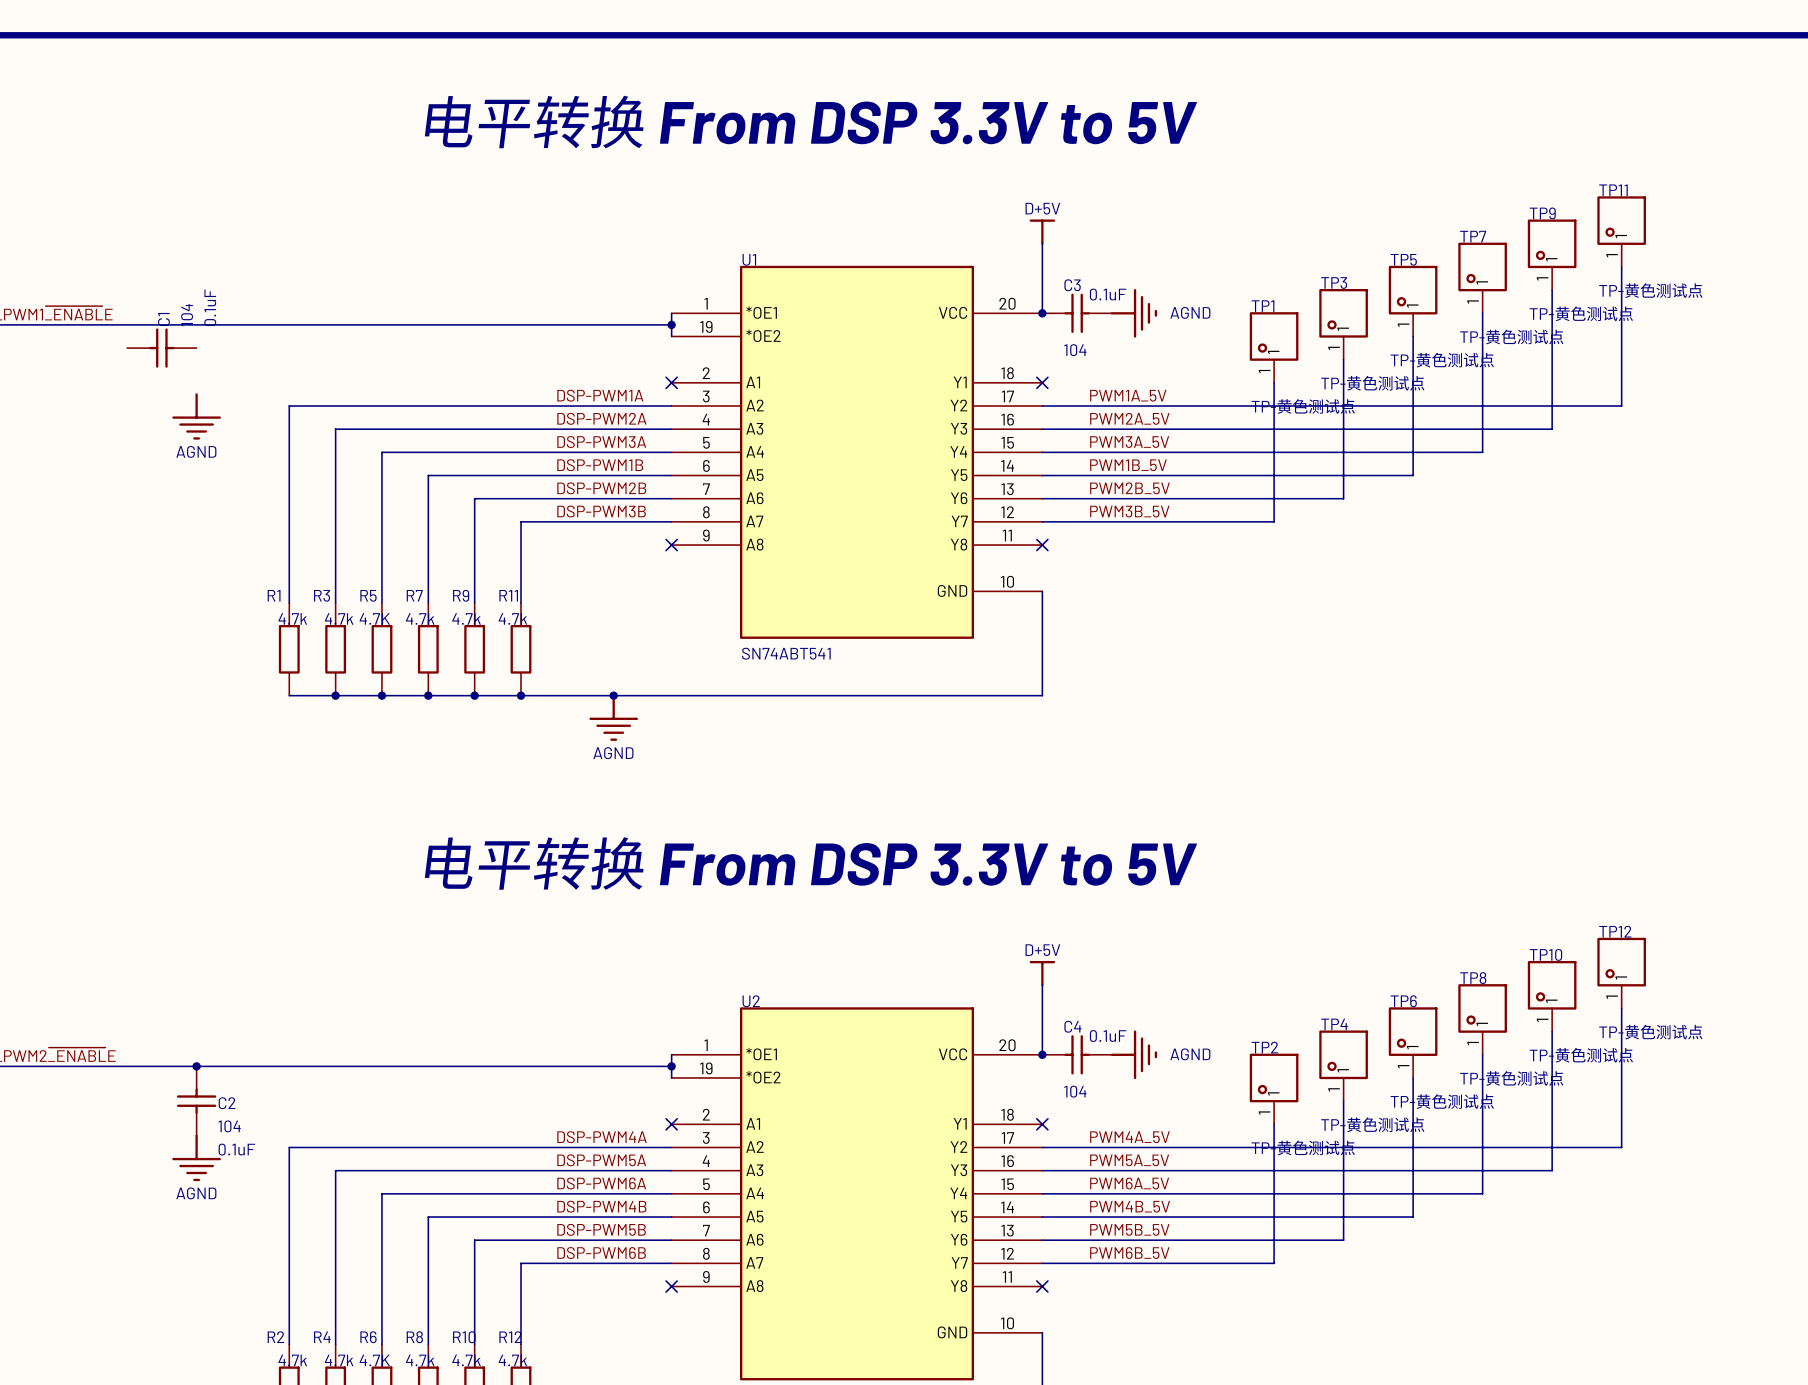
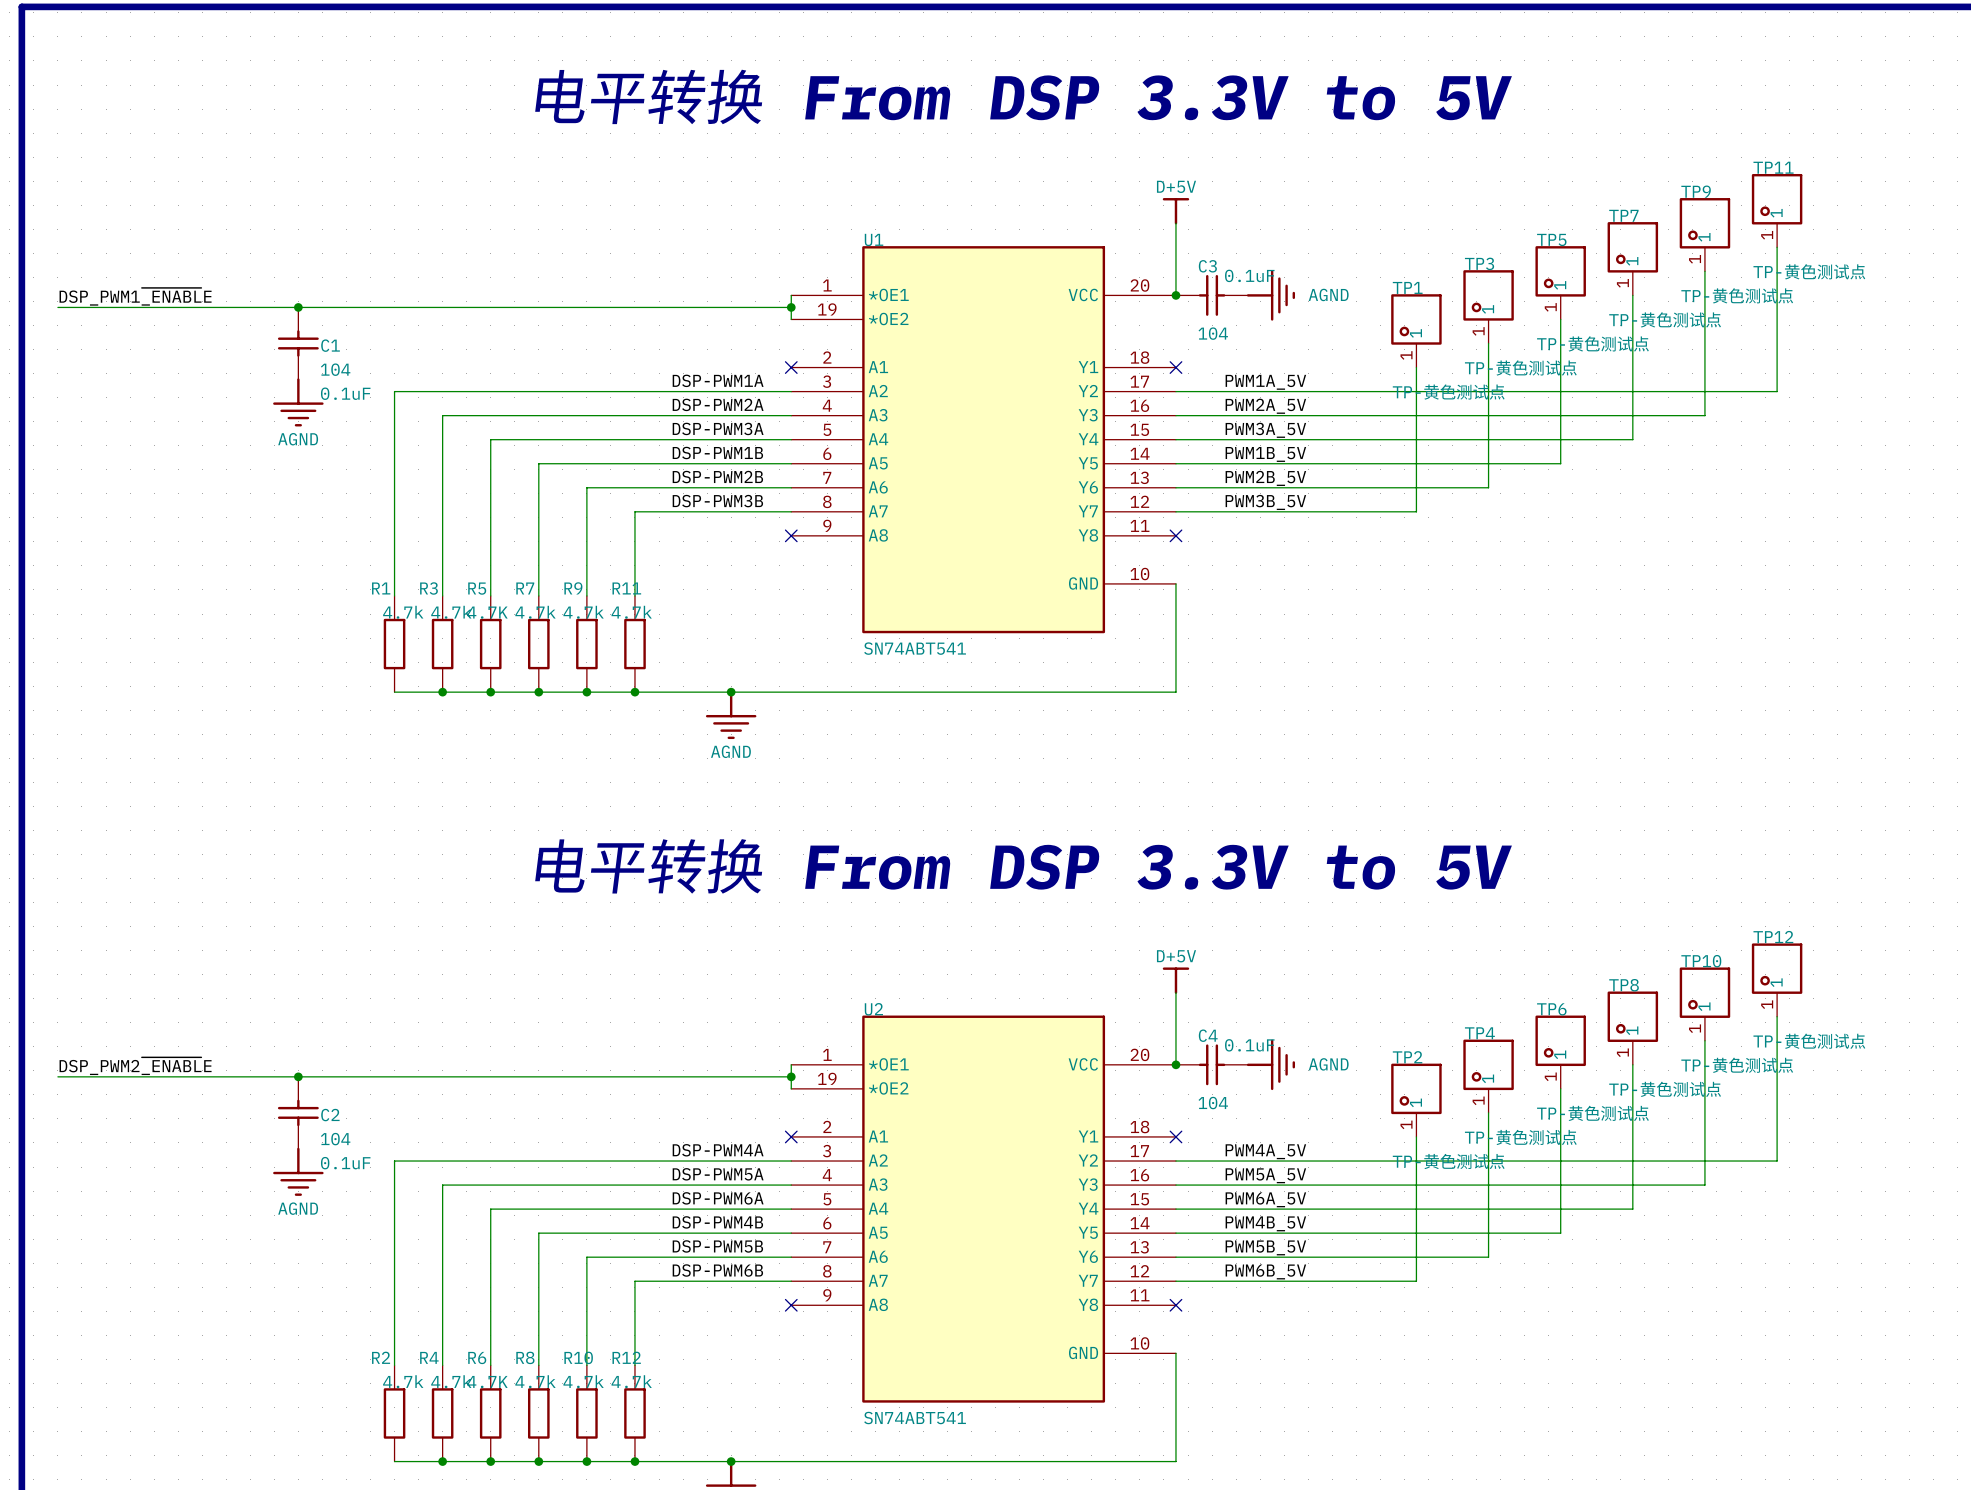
junction: none -> (298, 307)
C1 rotation: 0° (161, 348) -> 90° clockwise (298, 343)

